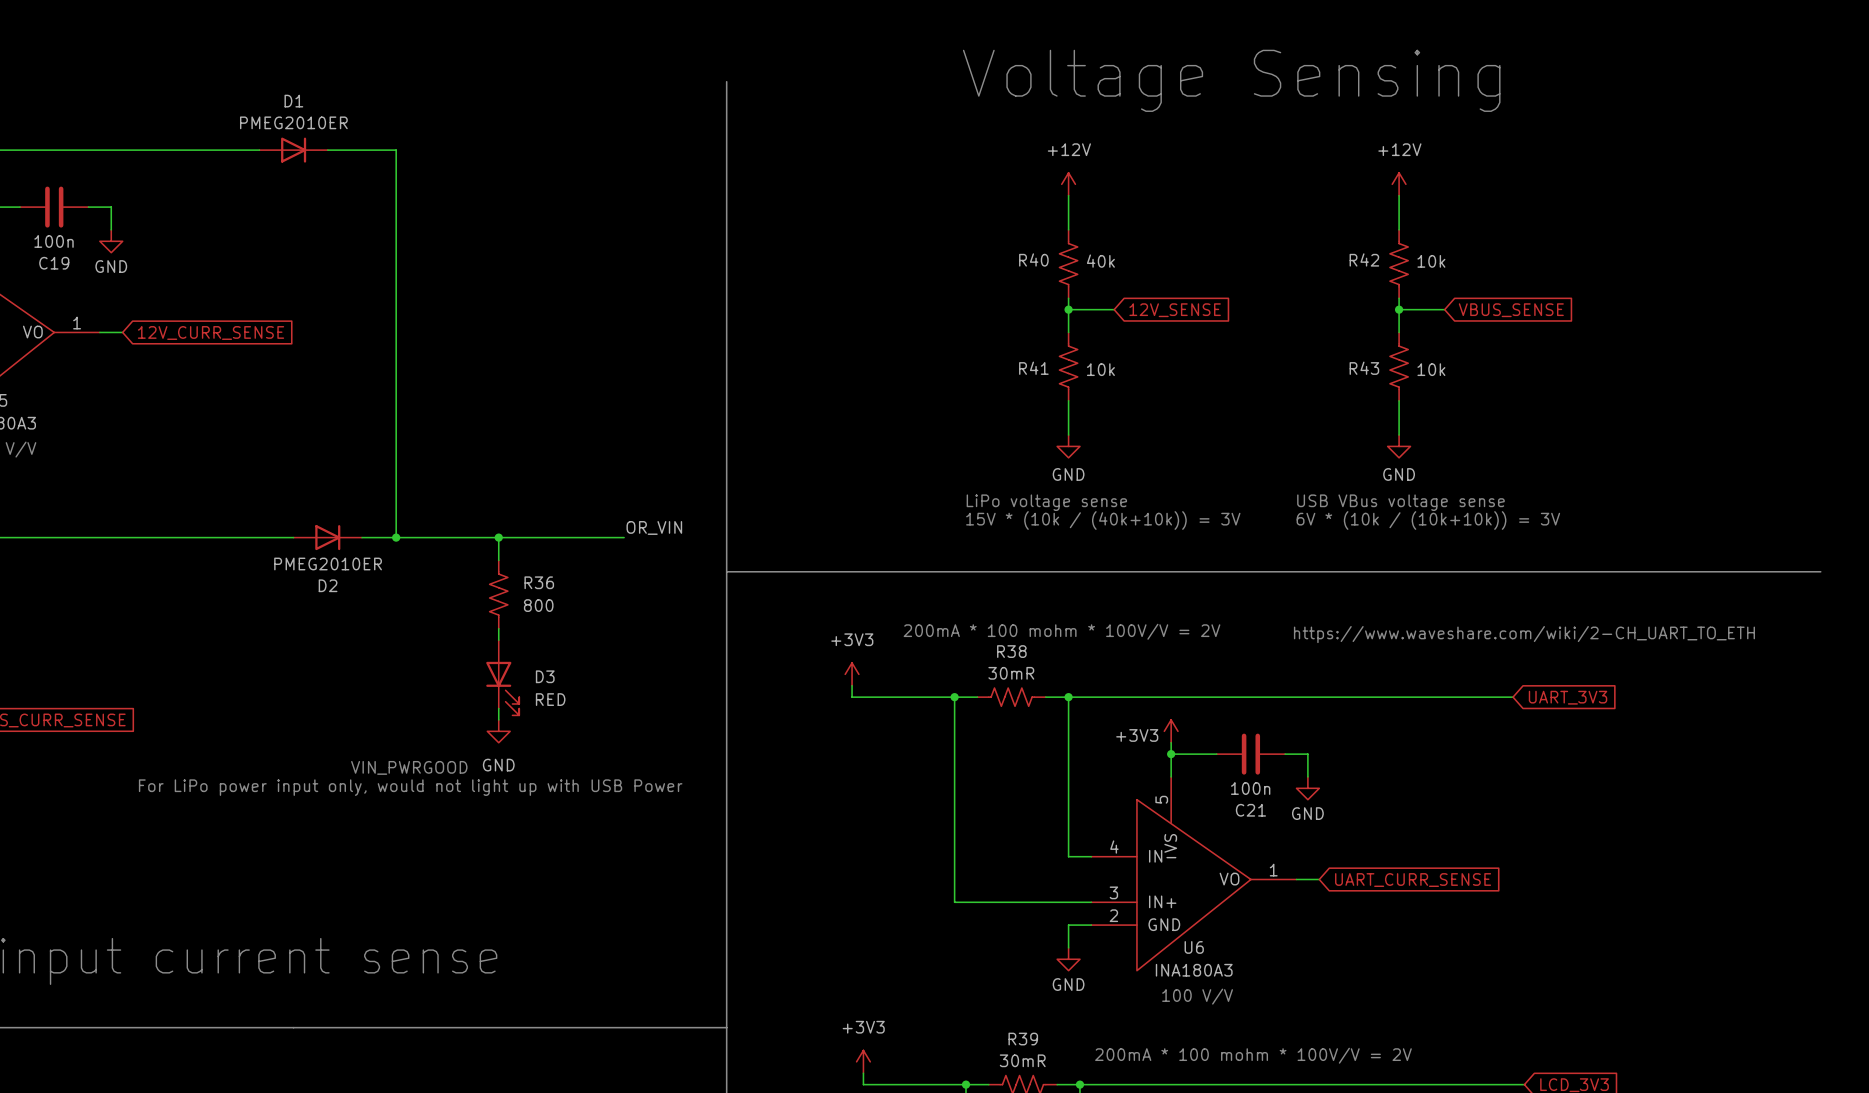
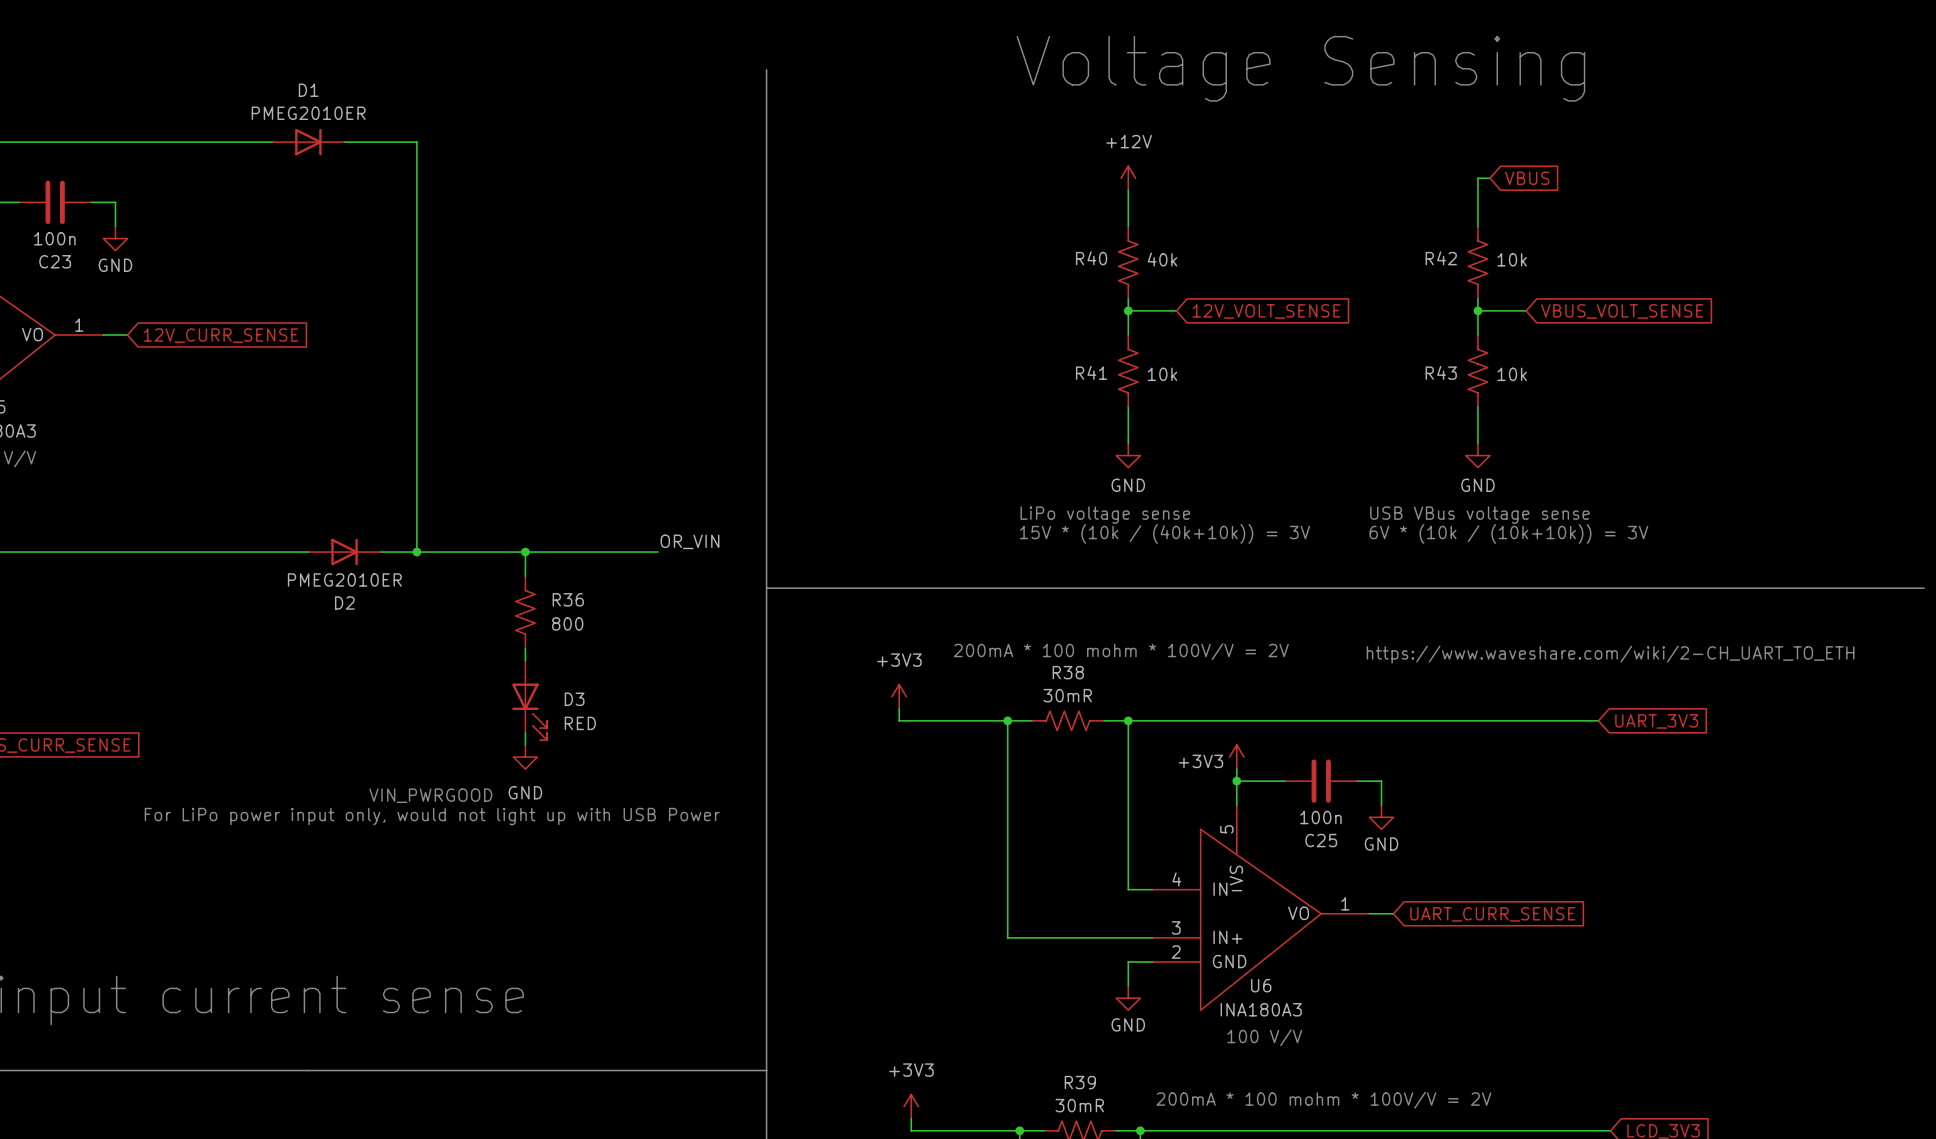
power symbol: +12V (1399, 184) -> none
global label: none -> VBUS (1527, 178)
C19 name: C19 (54, 263) -> C23 (55, 261)
global label: 12V_SENSE (1175, 310) -> 12V_VOLT_SENSE (1266, 311)
global label: VBUS_SENSE (1511, 310) -> VBUS_VOLT_SENSE (1622, 311)
C21 name: C21 (1250, 810) -> C25 (1321, 840)

